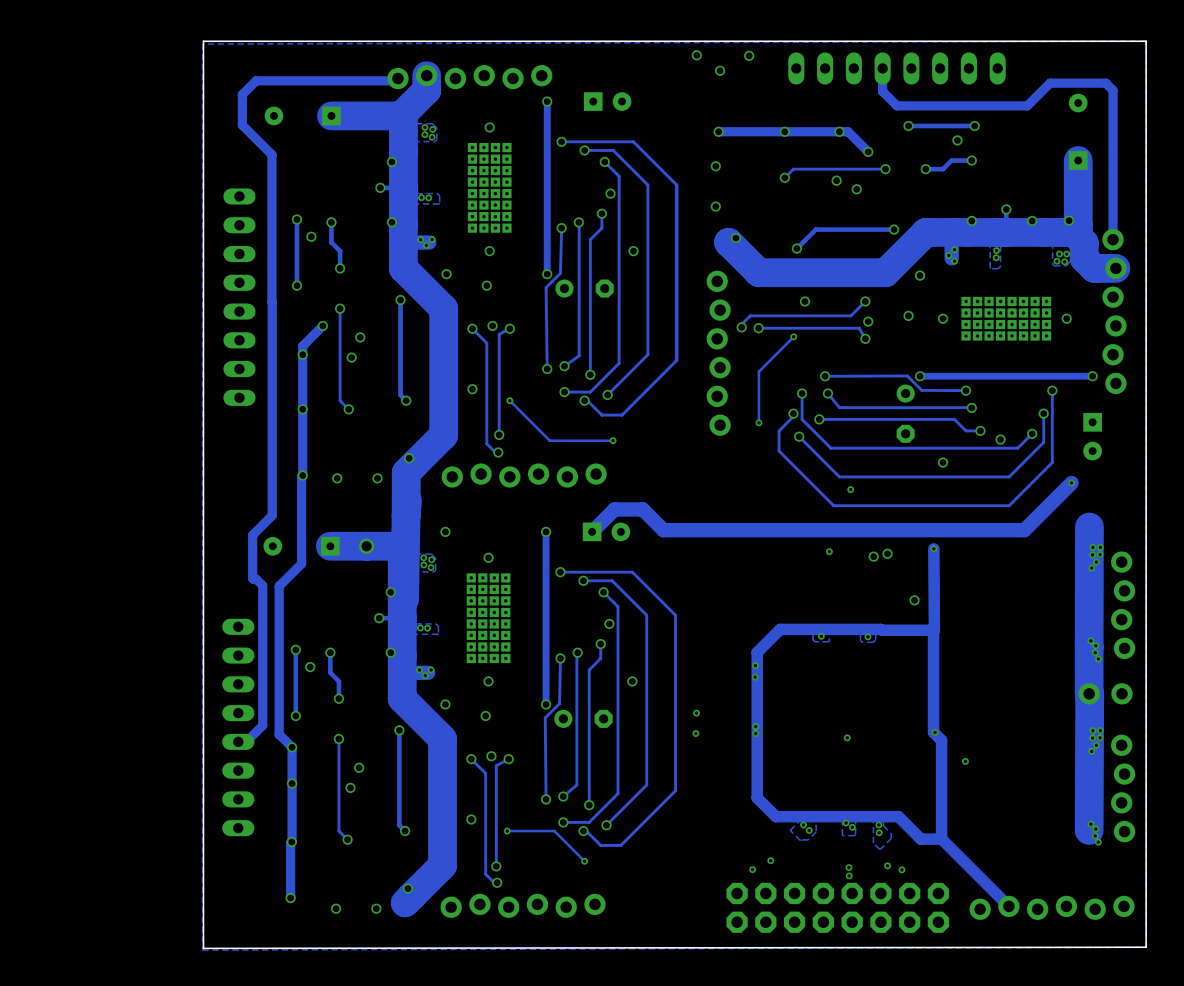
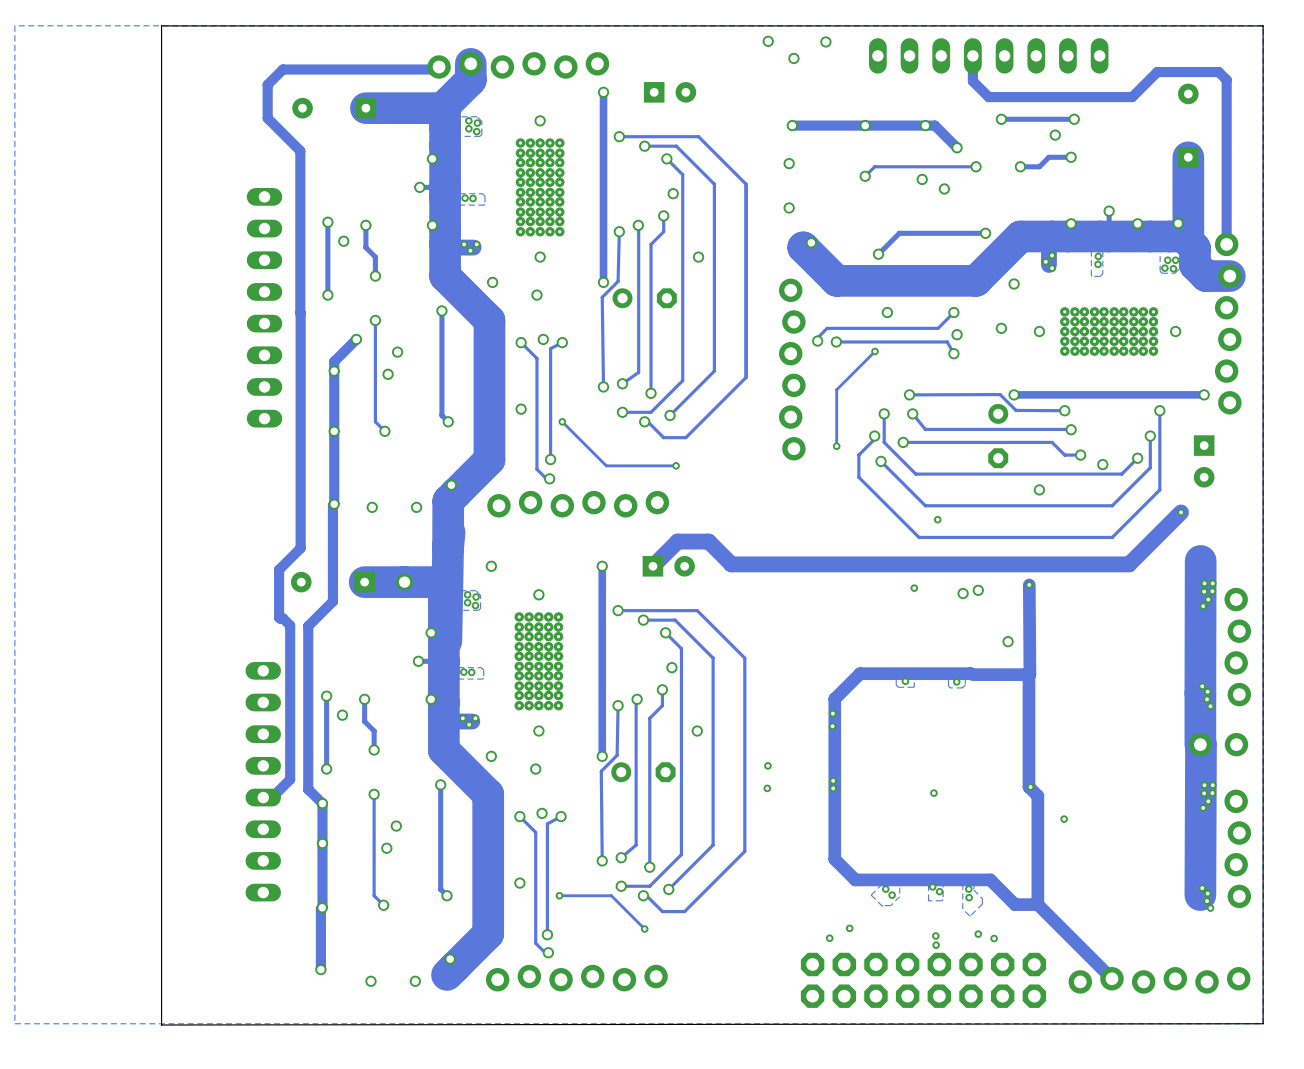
board edge: (203, 41) (203, 948) -> (224, 25) (161, 25) (161, 1025) (224, 1025)
zone outline: (1146, 41) (202, 44) (202, 950) (1146, 947) -> (1263, 25) (14, 25) (14, 1023) (1263, 1023)
part footprint: [467, 142, 512, 233] -> [515, 138, 565, 237]
part footprint: [961, 296, 1052, 341] -> [1060, 307, 1159, 356]
part footprint: [466, 573, 511, 664] -> [514, 612, 564, 711]

